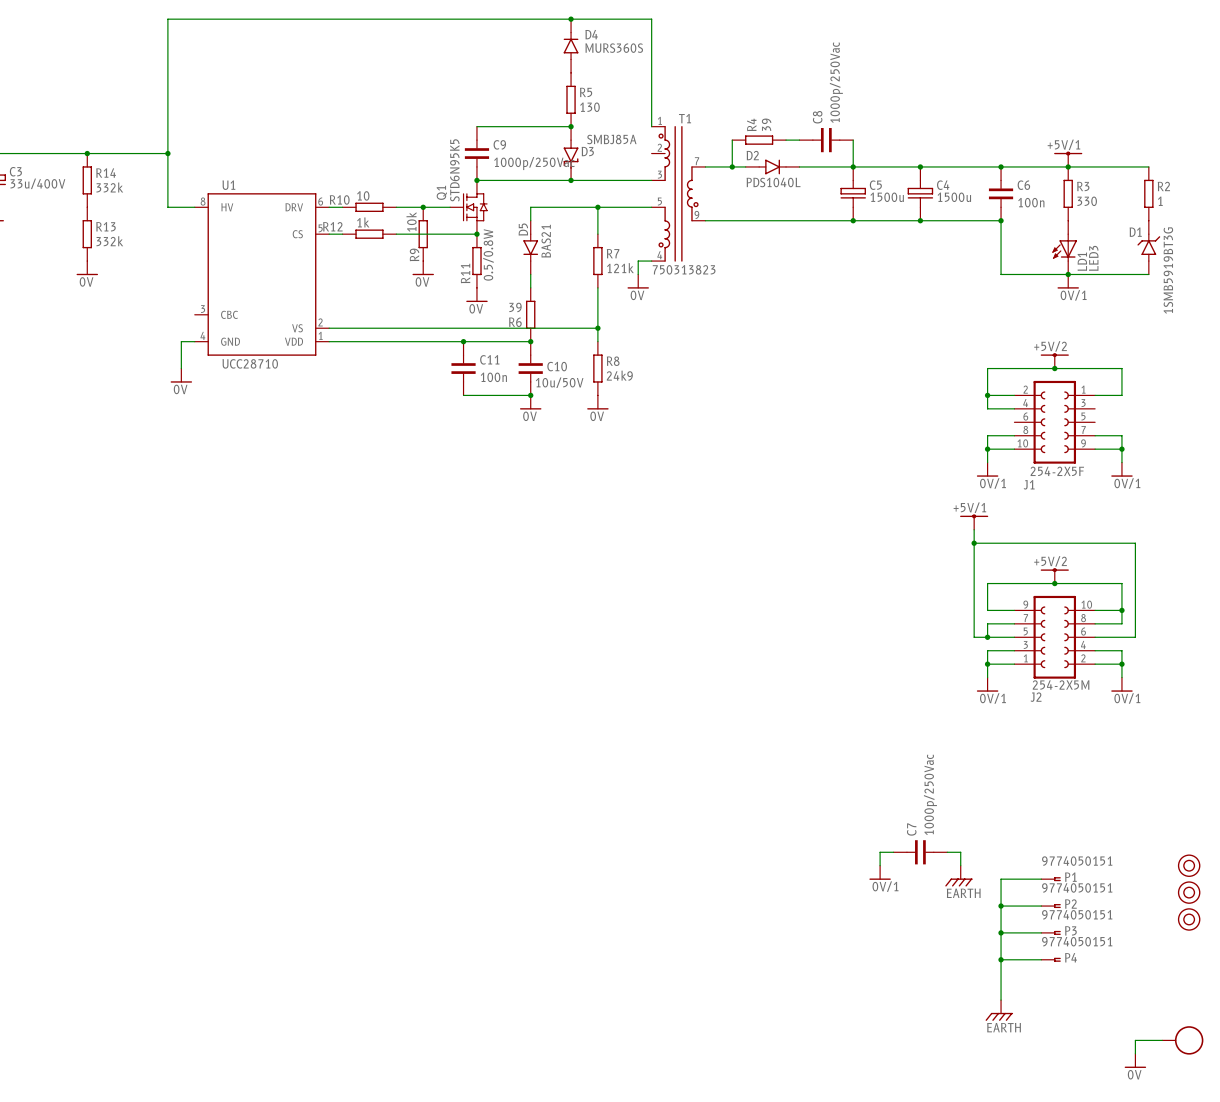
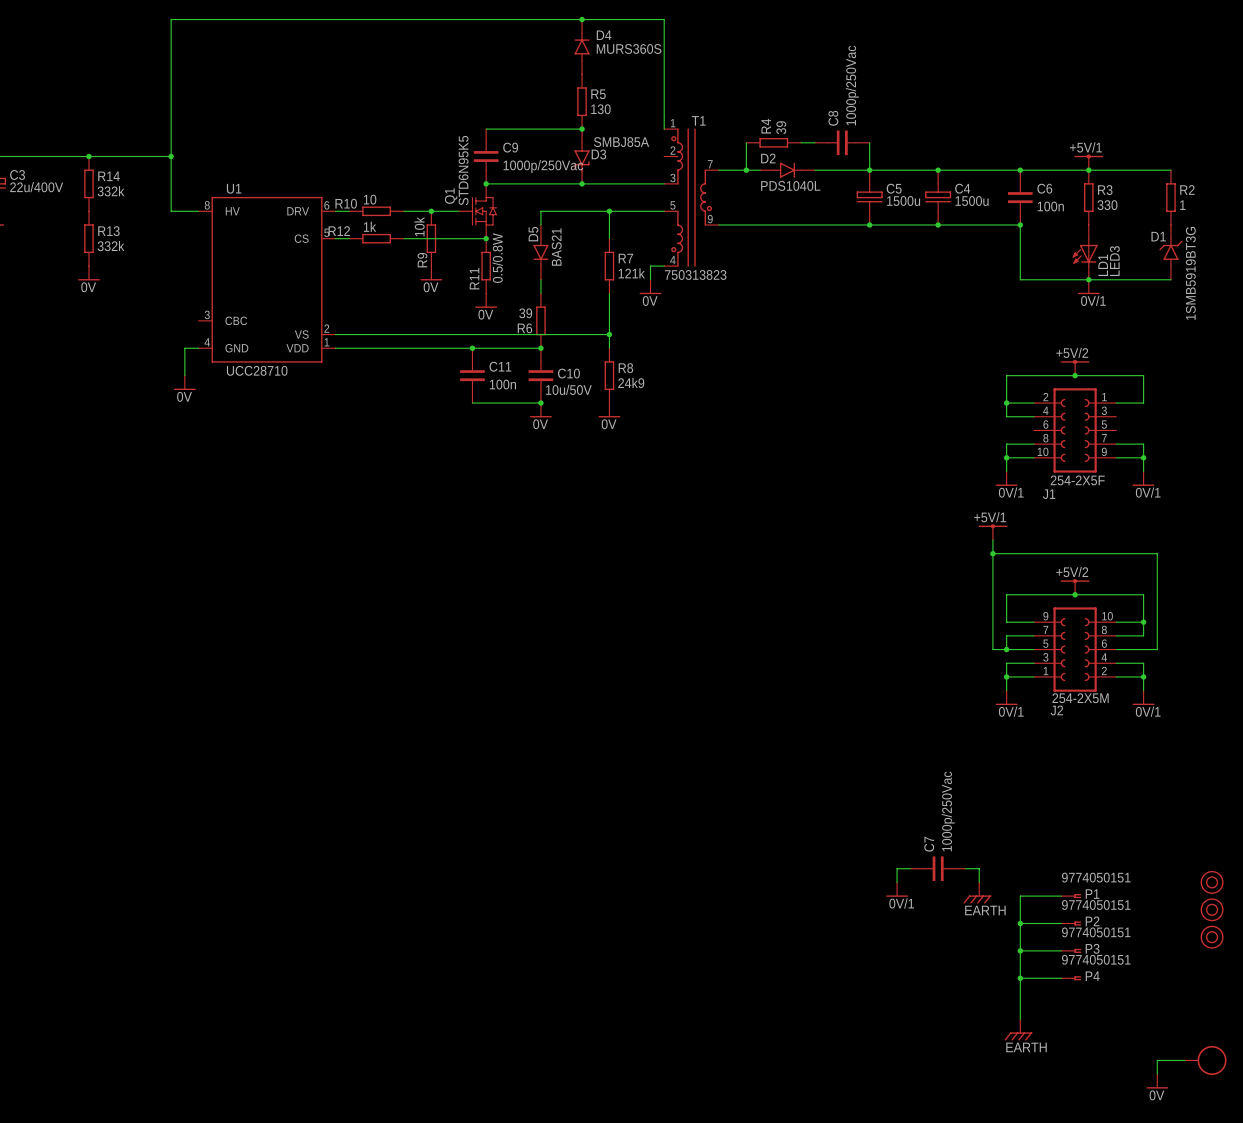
C3 value: 33u/400V (37, 183) -> 22u/400V (36, 187)

